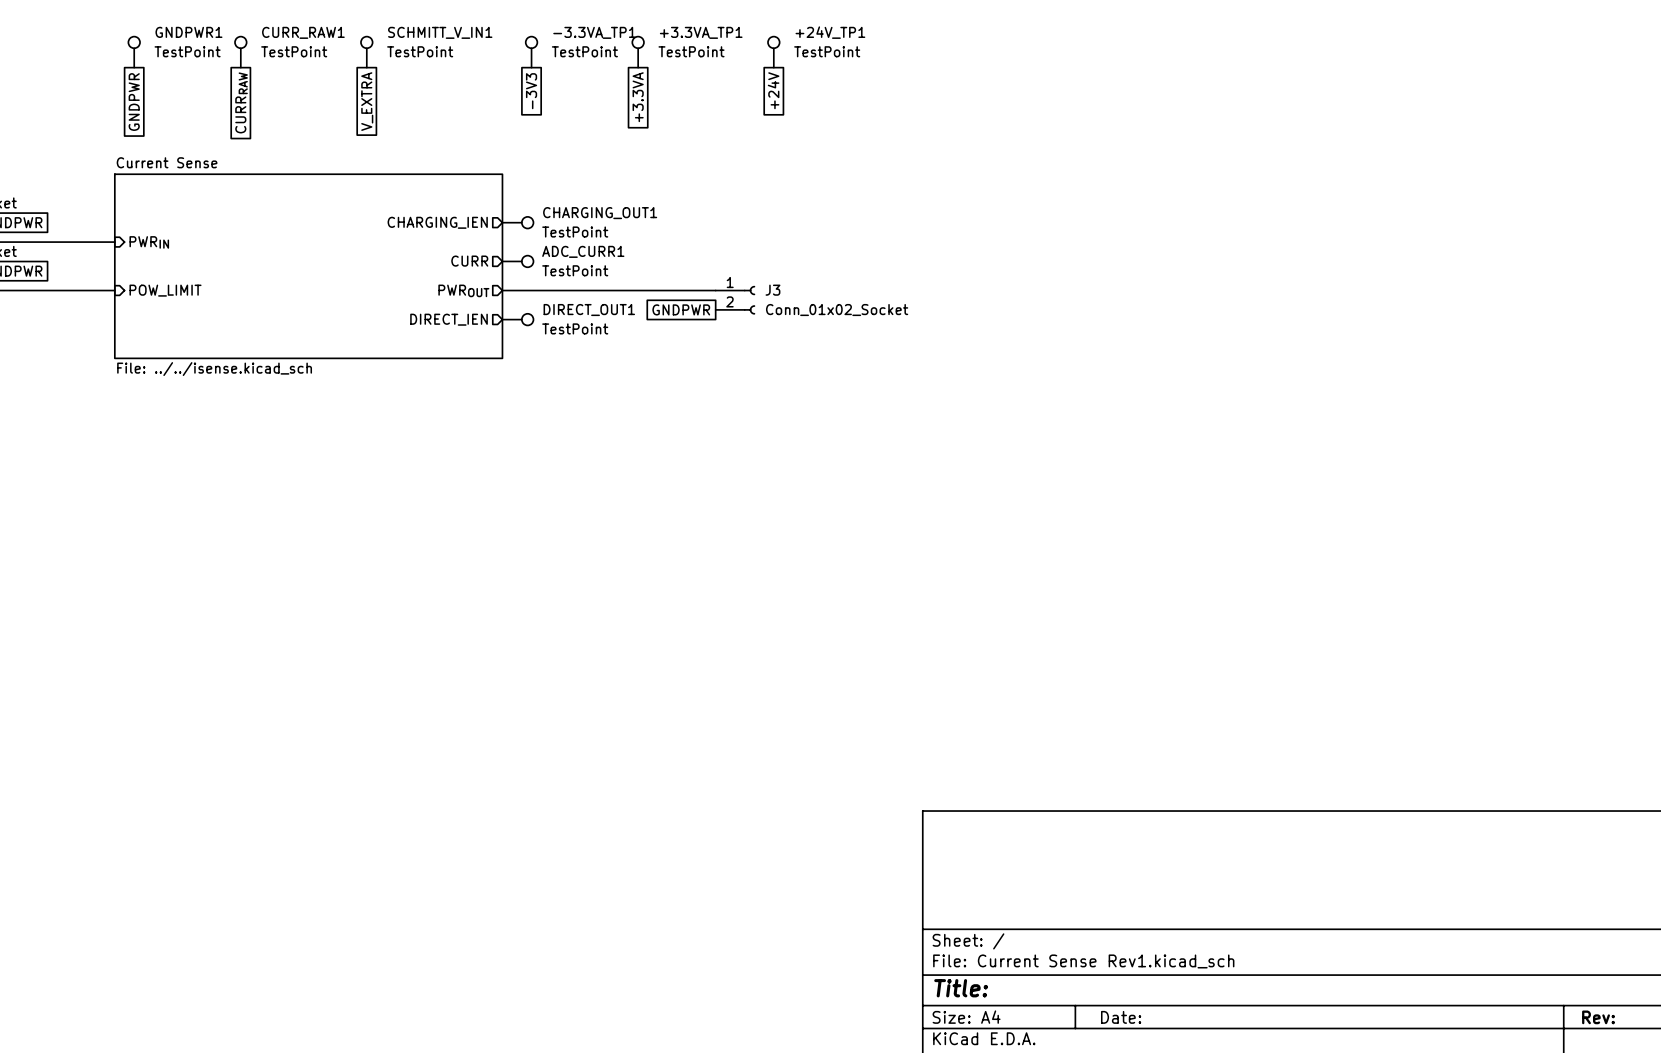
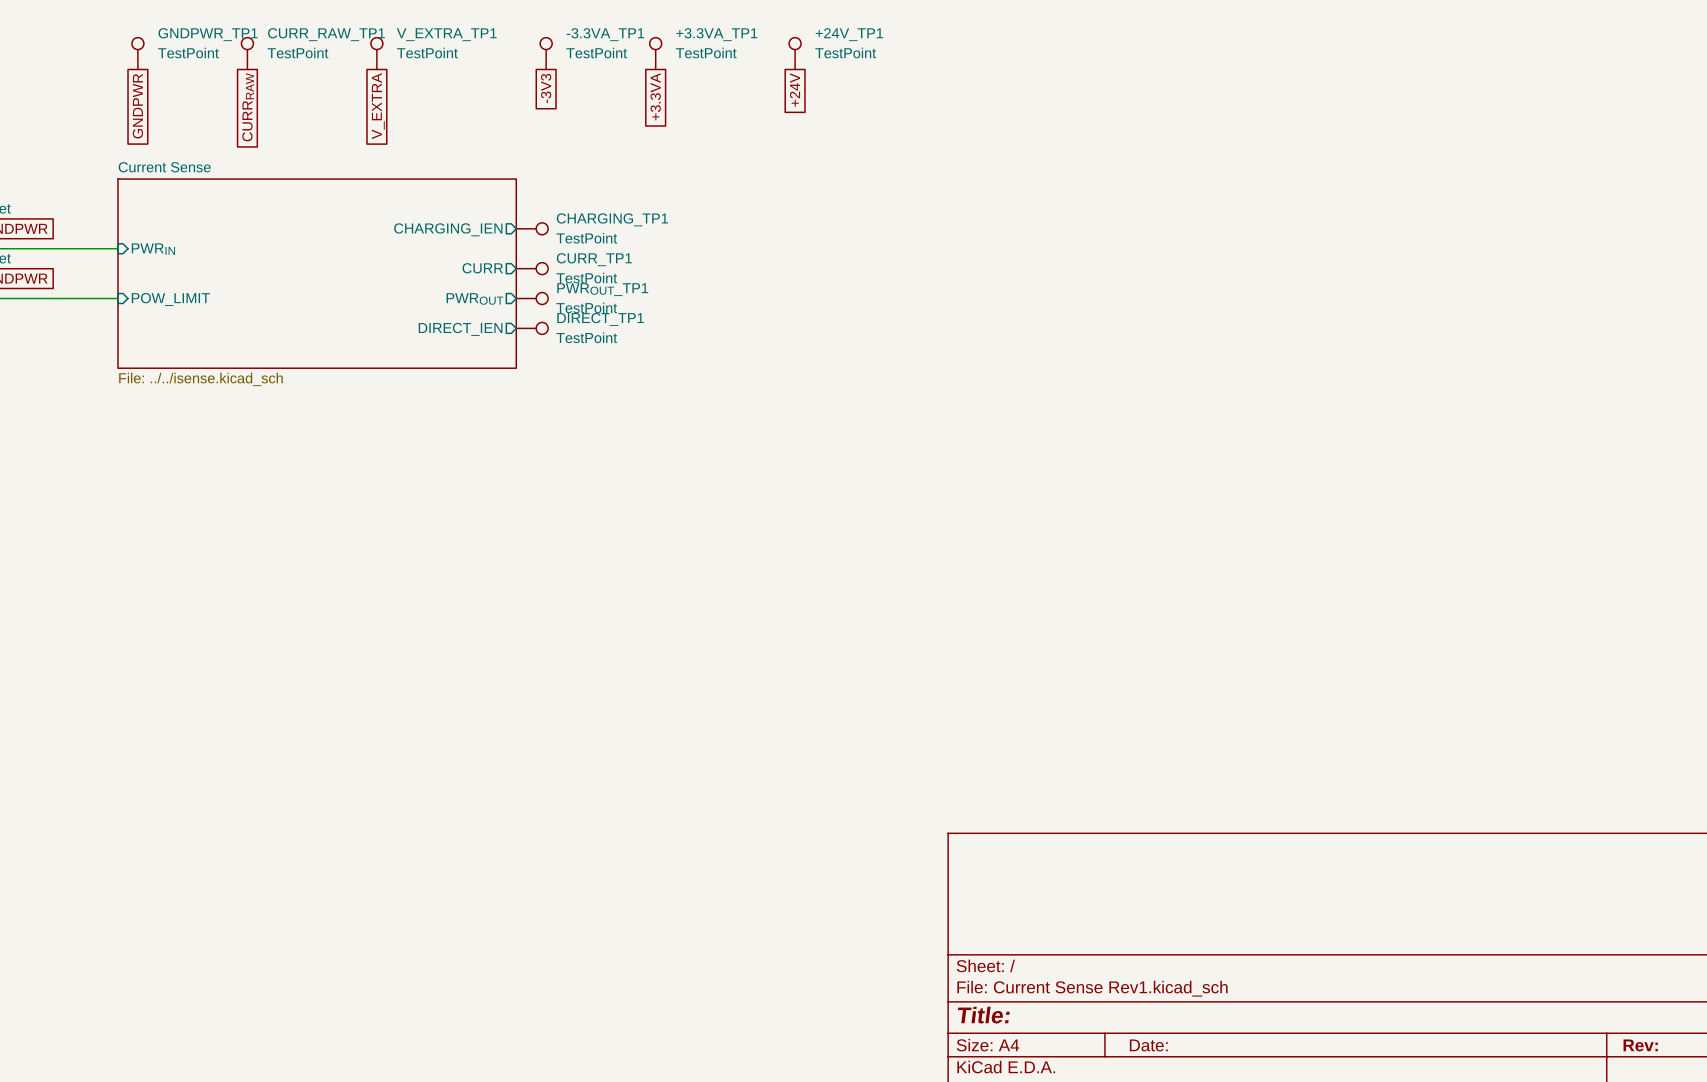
GNDPWR1 name: GNDPWR1 (188, 32) -> GNDPWR_TP1 (208, 34)
CURR_RAW1 name: CURR_RAW1 (303, 32) -> CURR_RAW_TP1 (326, 34)
SCHMITT_V_IN1 name: SCHMITT_V_IN1 (440, 32) -> V_EXTRA_TP1 (446, 34)
CHARGING_OUT1 name: CHARGING_OUT1 (600, 213) -> CHARGING_TP1 (612, 219)
ADC_CURR1 name: ADC_CURR1 (583, 251) -> CURR_TP1 (594, 259)
wire: (502, 290) (715, 290) -> none
PWROUT_TP1: none -> TestPoint (532, 298)
J3: Conn_01x02_Socket (735, 300) -> none
global label: GNDPWR (681, 309) -> none
DIRECT_OUT1 name: DIRECT_OUT1 (589, 310) -> DIRECT_TP1 (600, 319)

